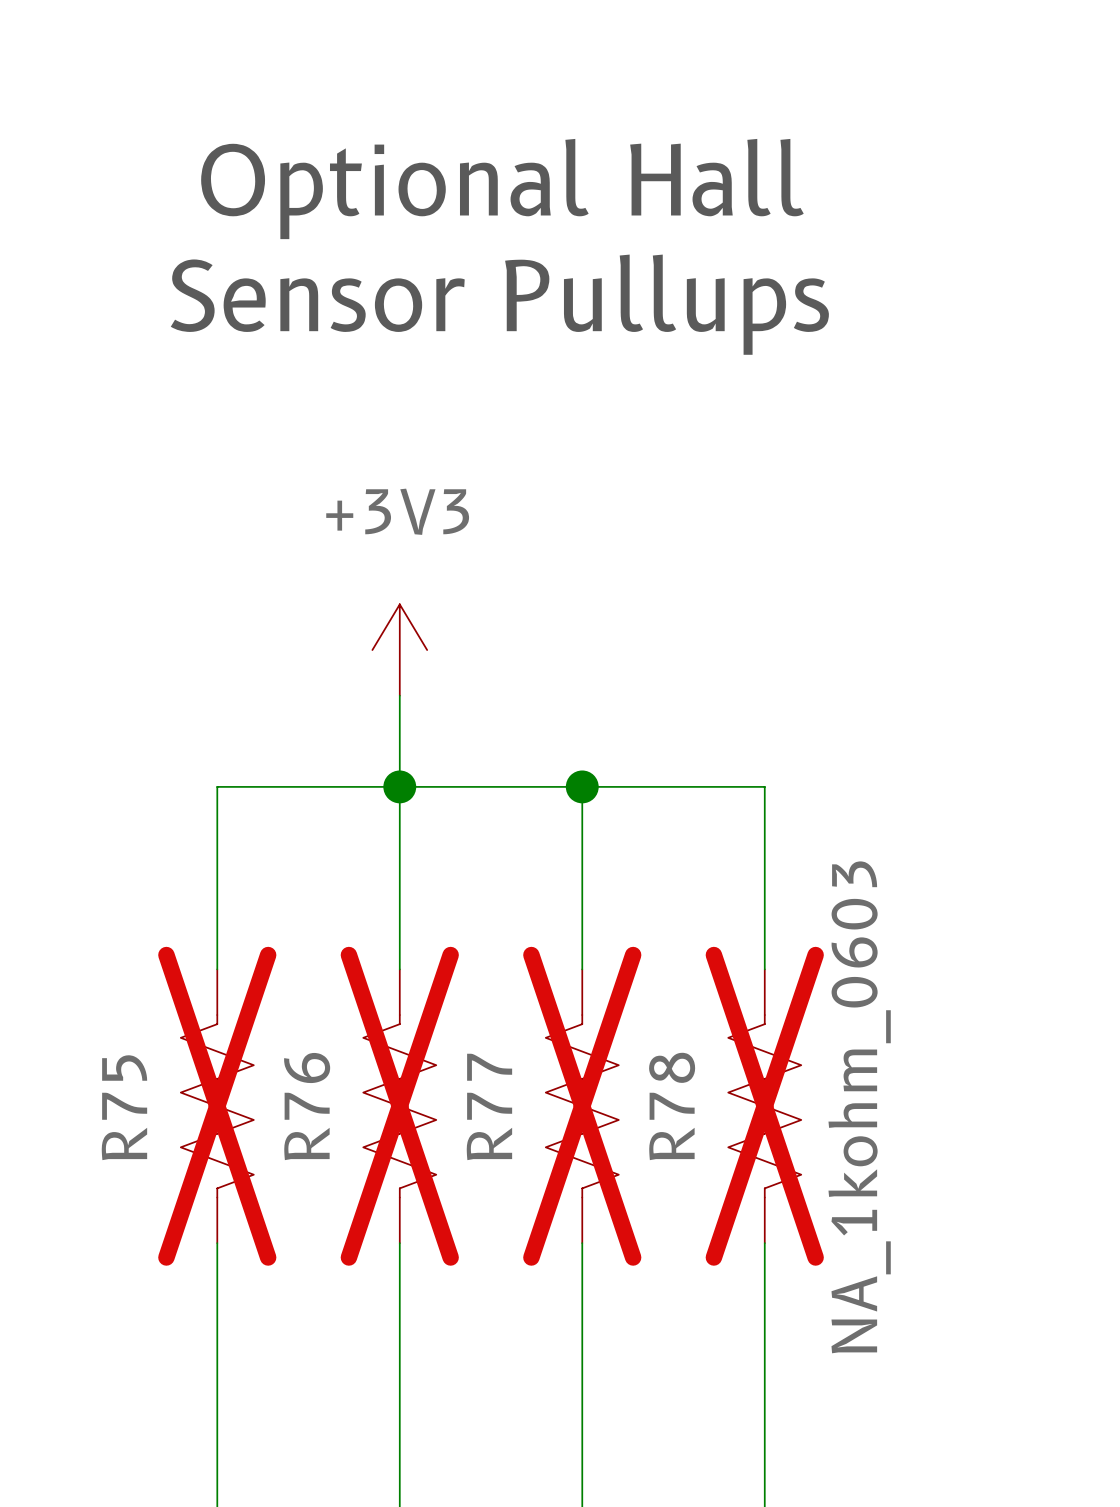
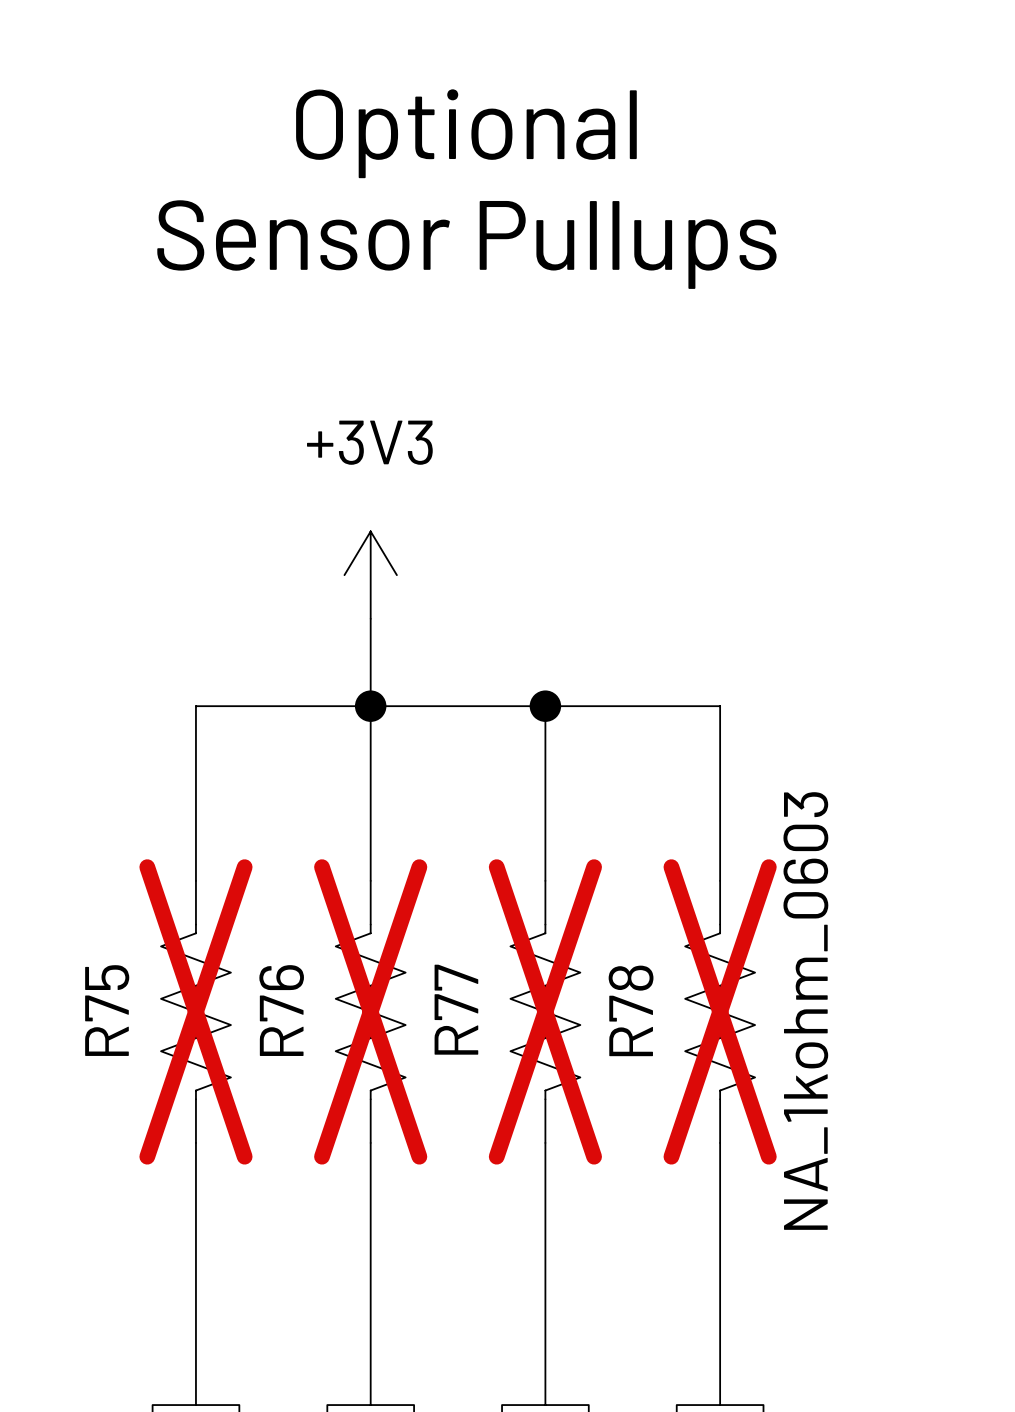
text: Optional Hall (502, 189) -> Optional (466, 133)

